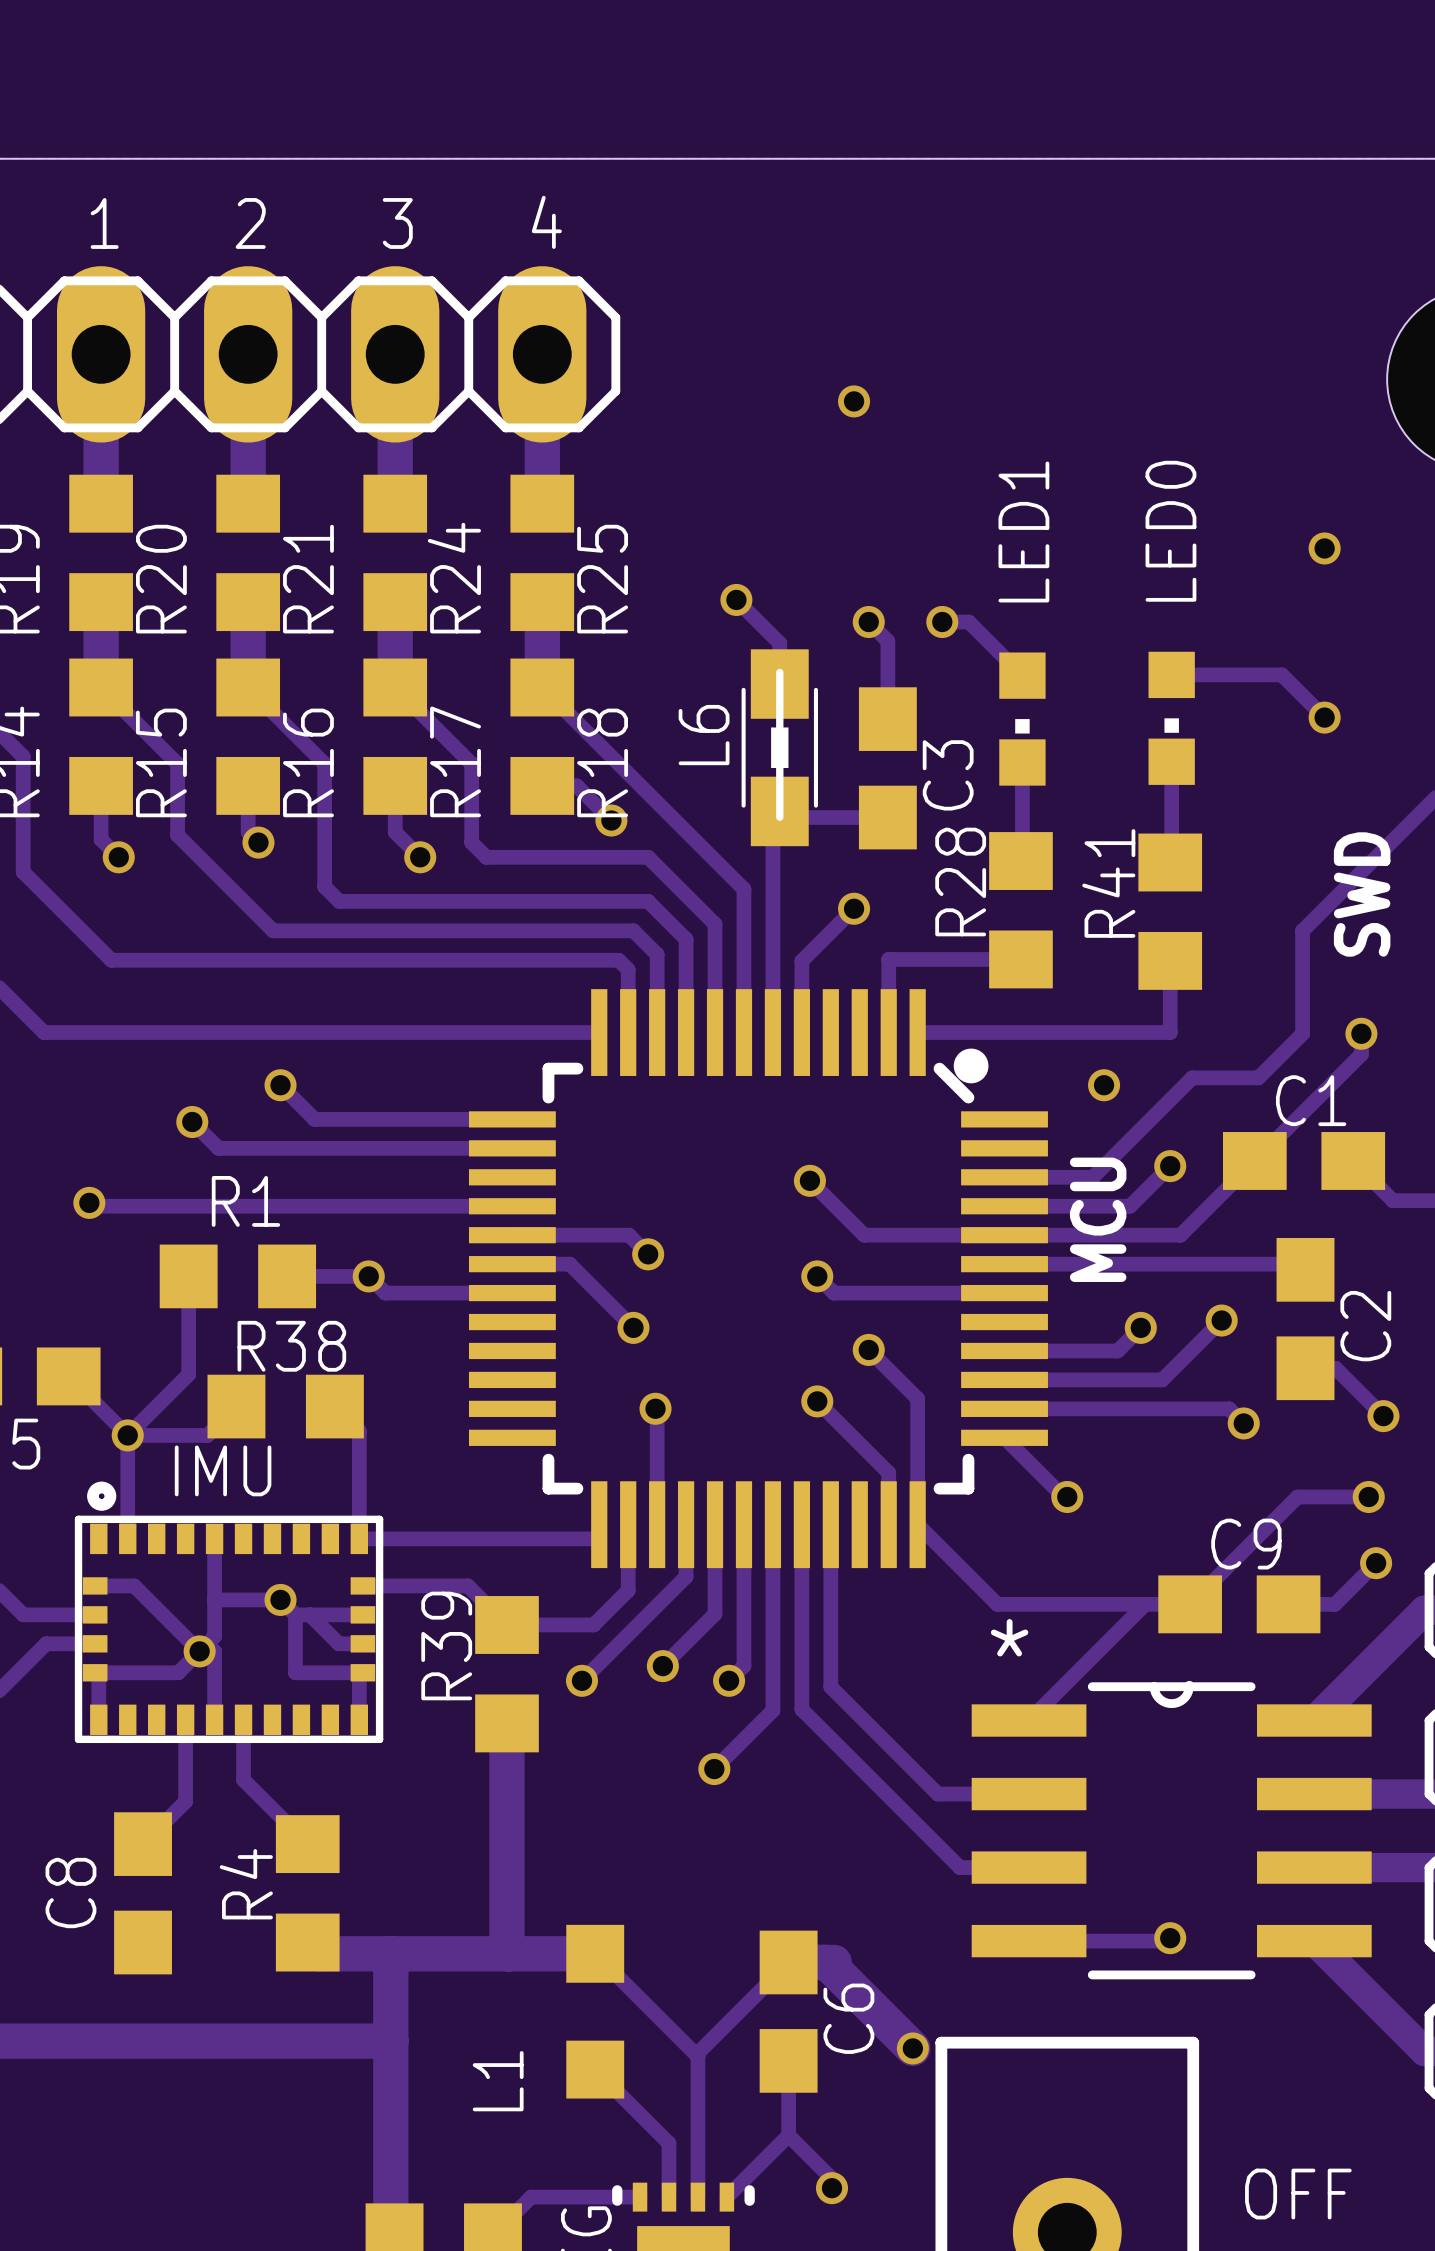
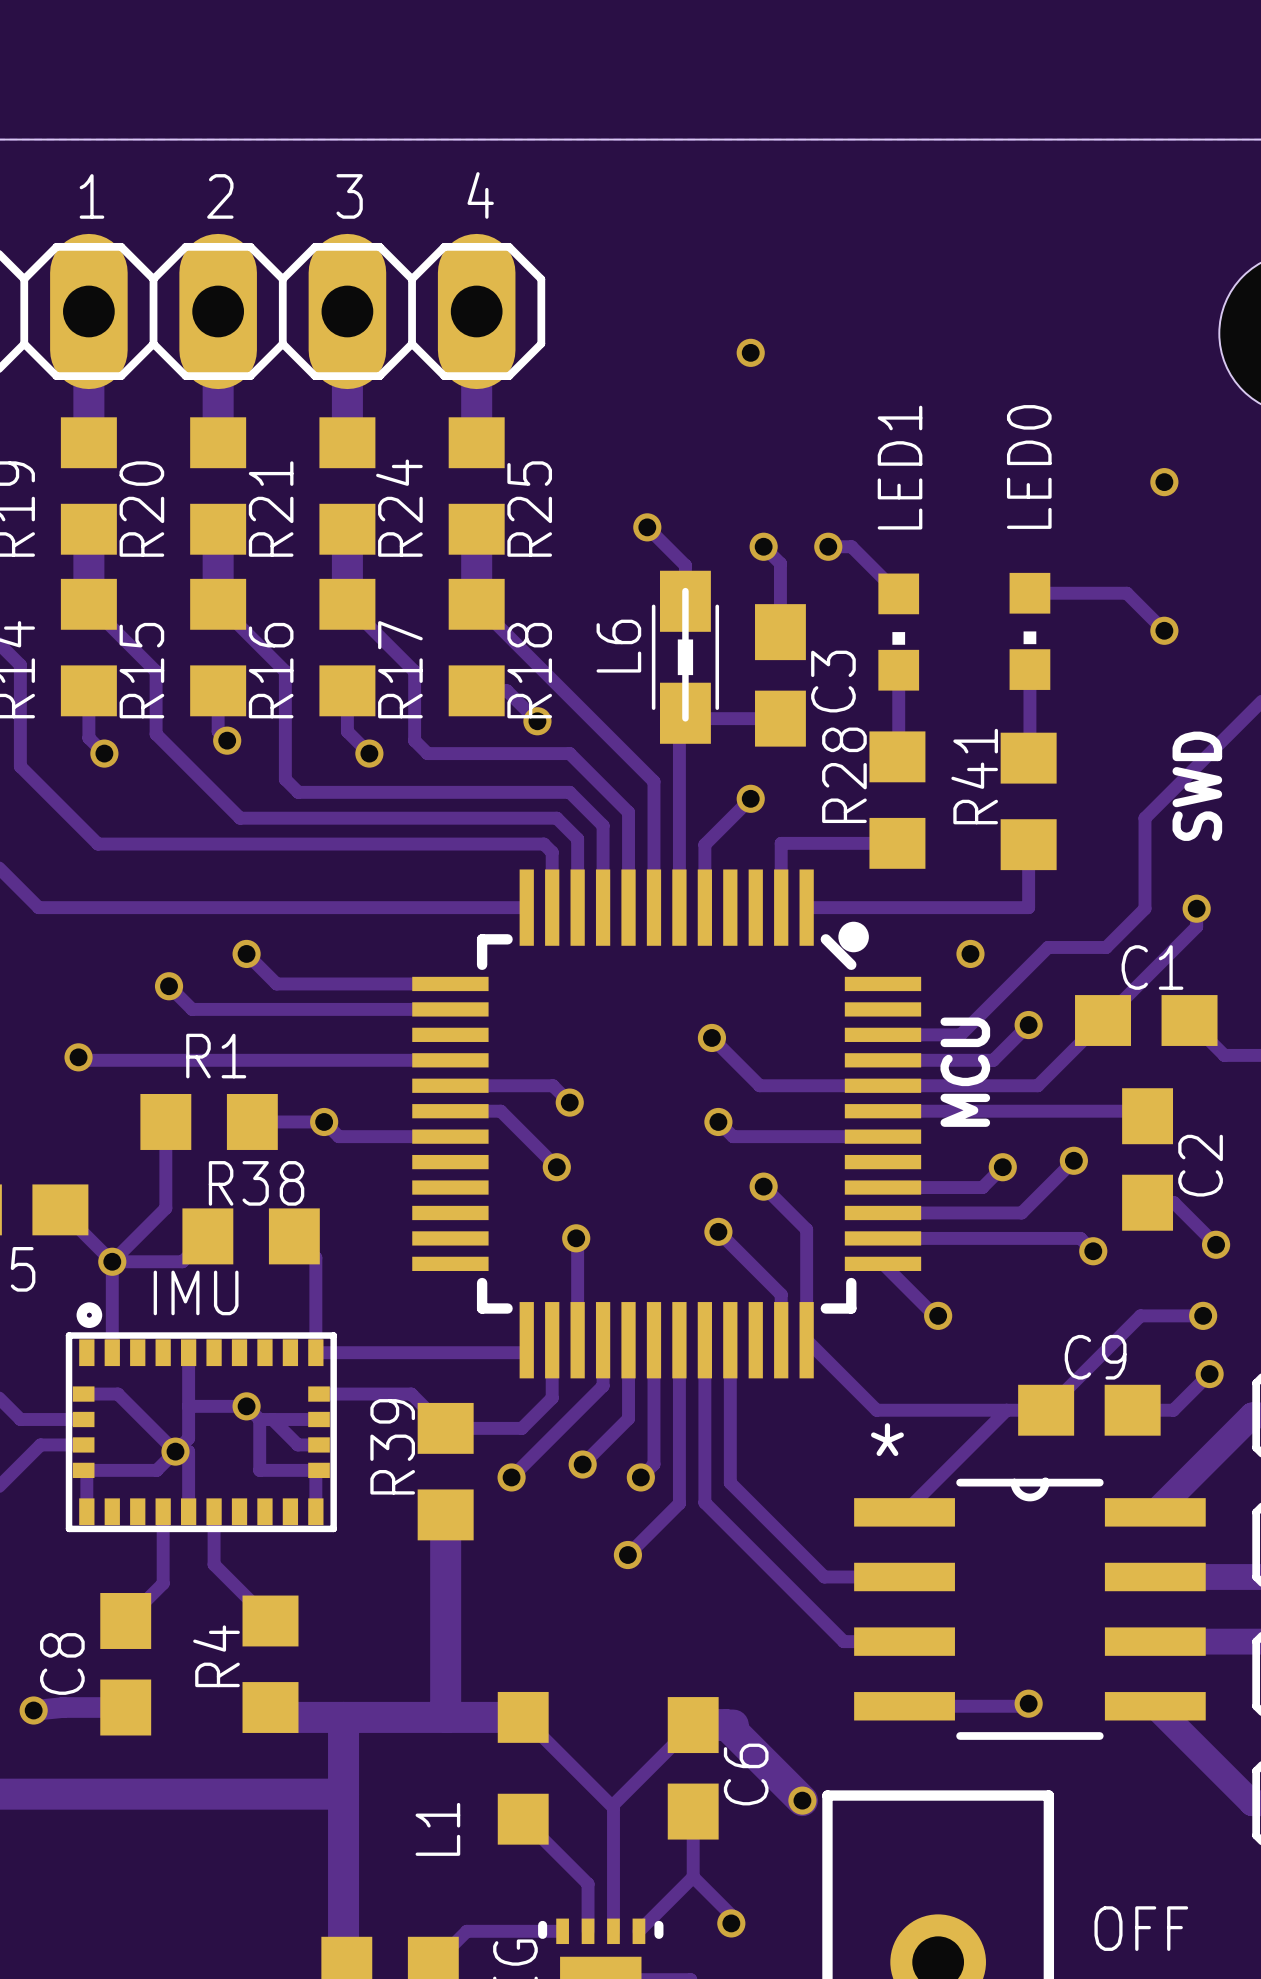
track: none -> (125, 1707) (62, 1707) (33, 1710)
via: none -> (33, 1710)

